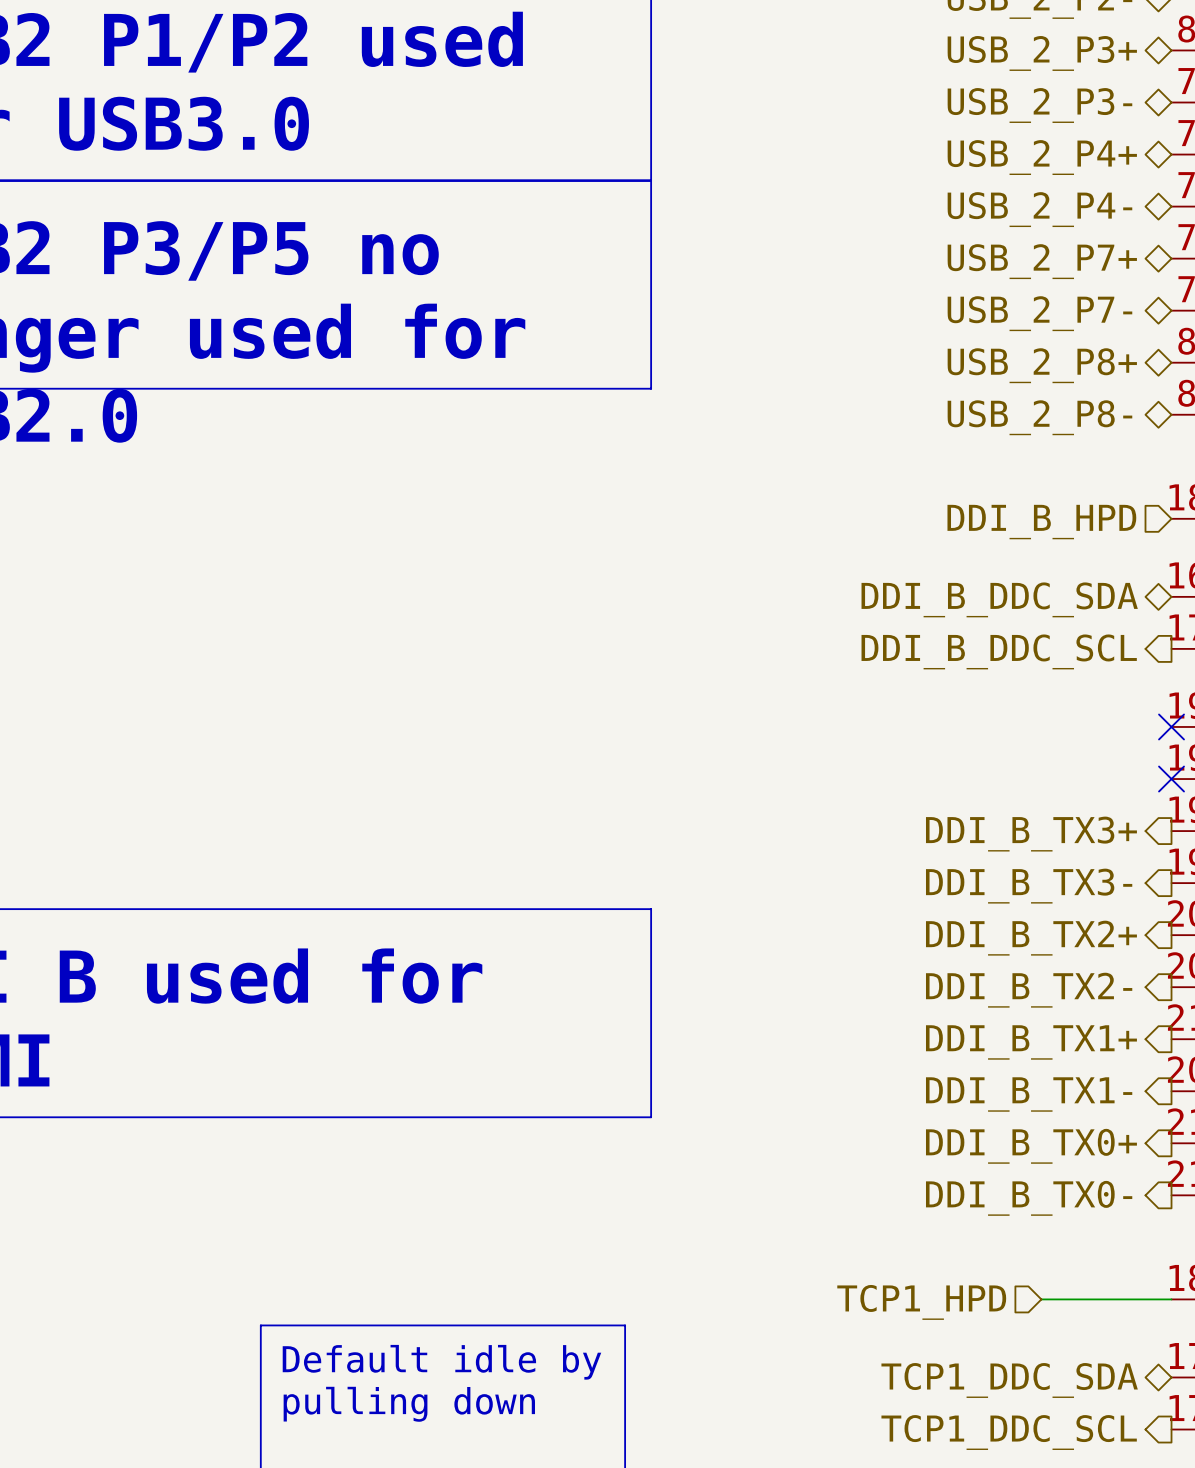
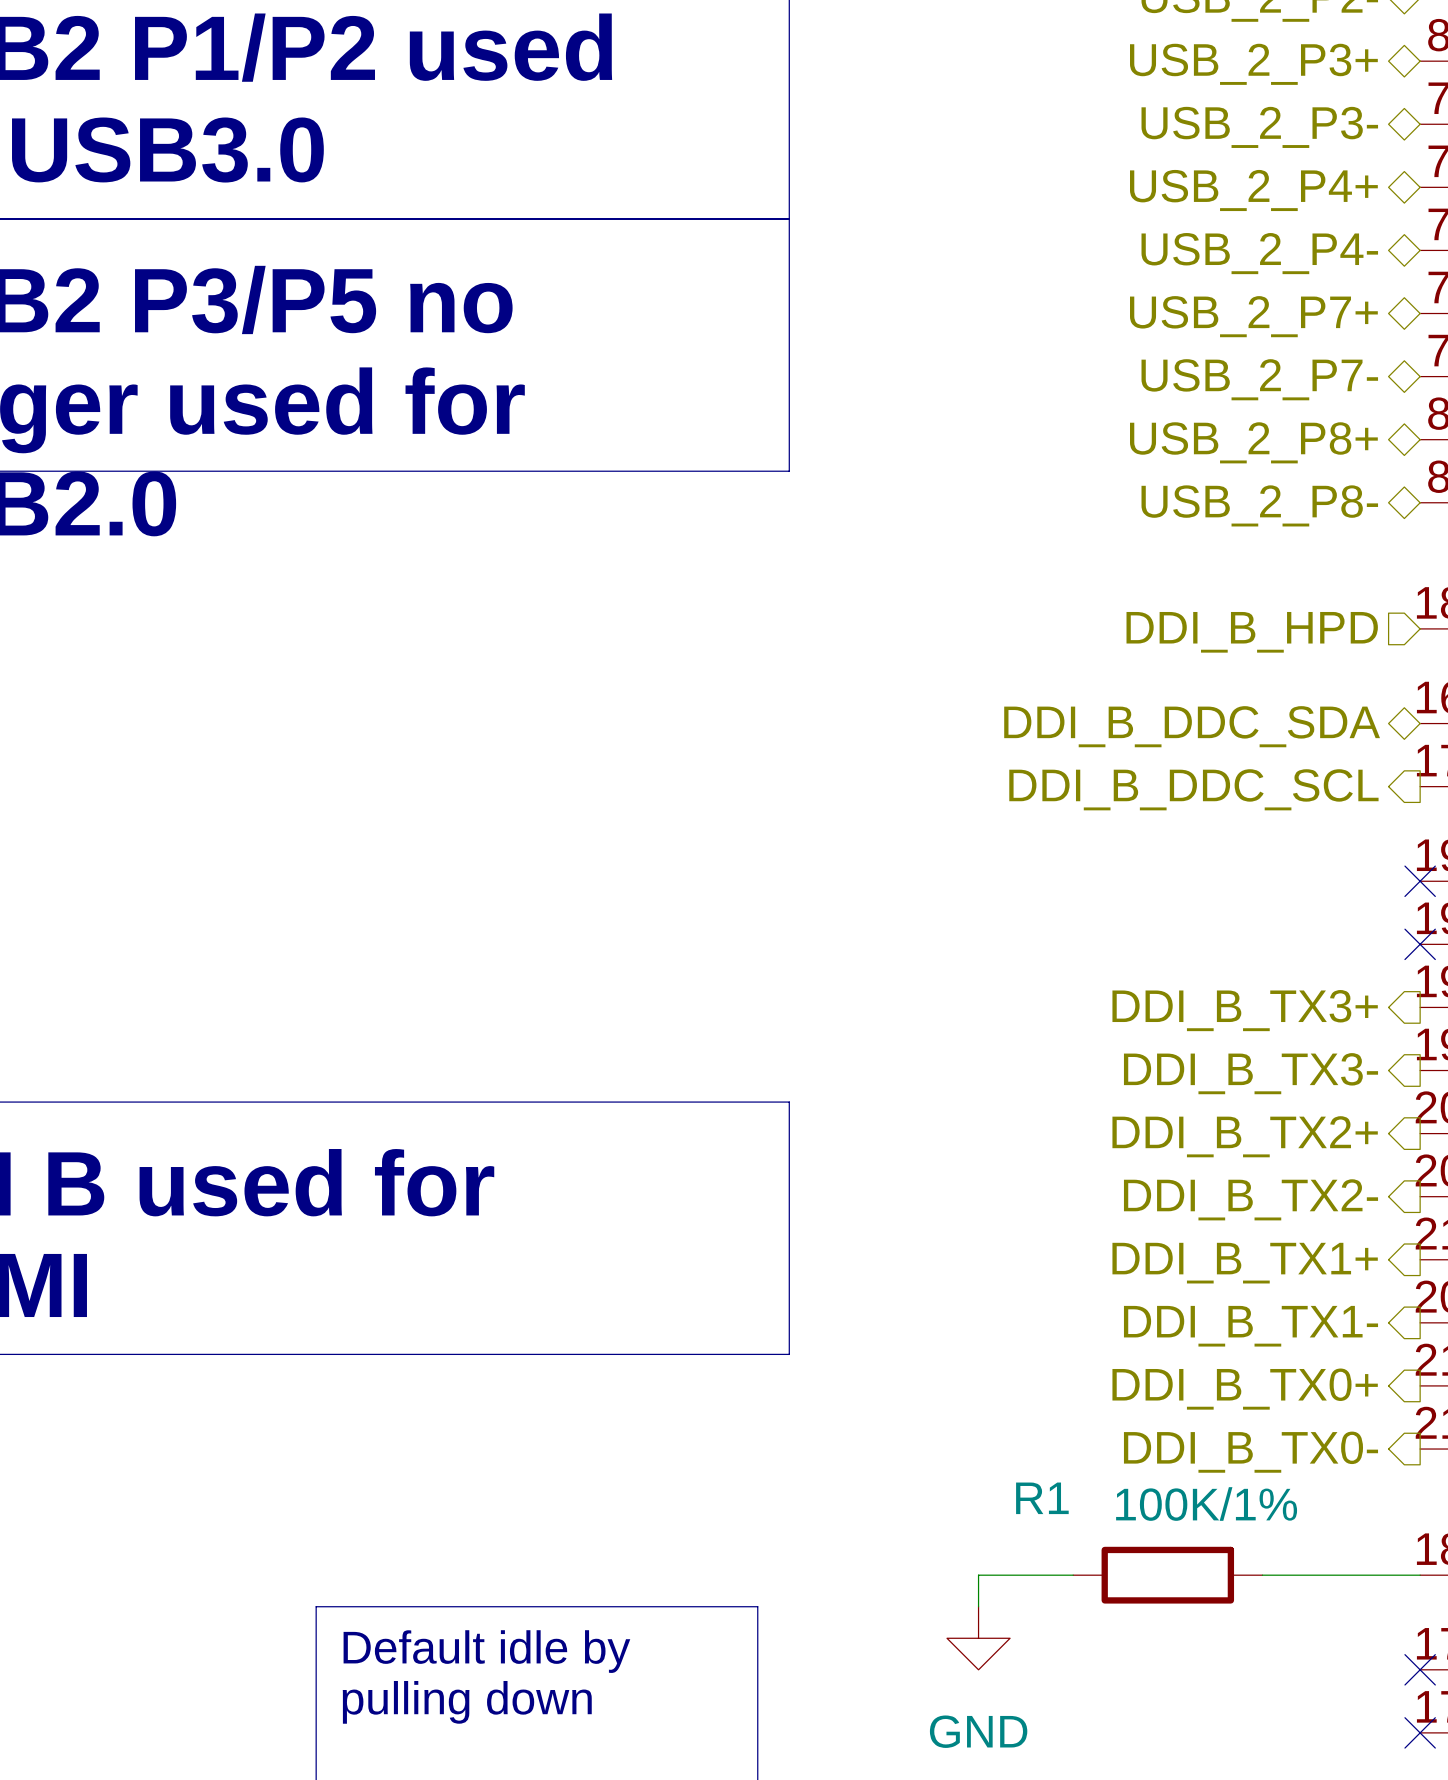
wire: none -> (1073, 1575) (978, 1575) (978, 1606)
R1: none -> 100K/1% (1167, 1575)
hierarchical label: TCP1_HPD (921, 1302) -> none
power symbol: none -> GND (978, 1638)
no-connect mark: none -> (1420, 1669)
hierarchical label: TCP1_DDC_SDA (1009, 1380) -> none
no-connect mark: none -> (1420, 1732)
hierarchical label: TCP1_DDC_SCL (1009, 1432) -> none

